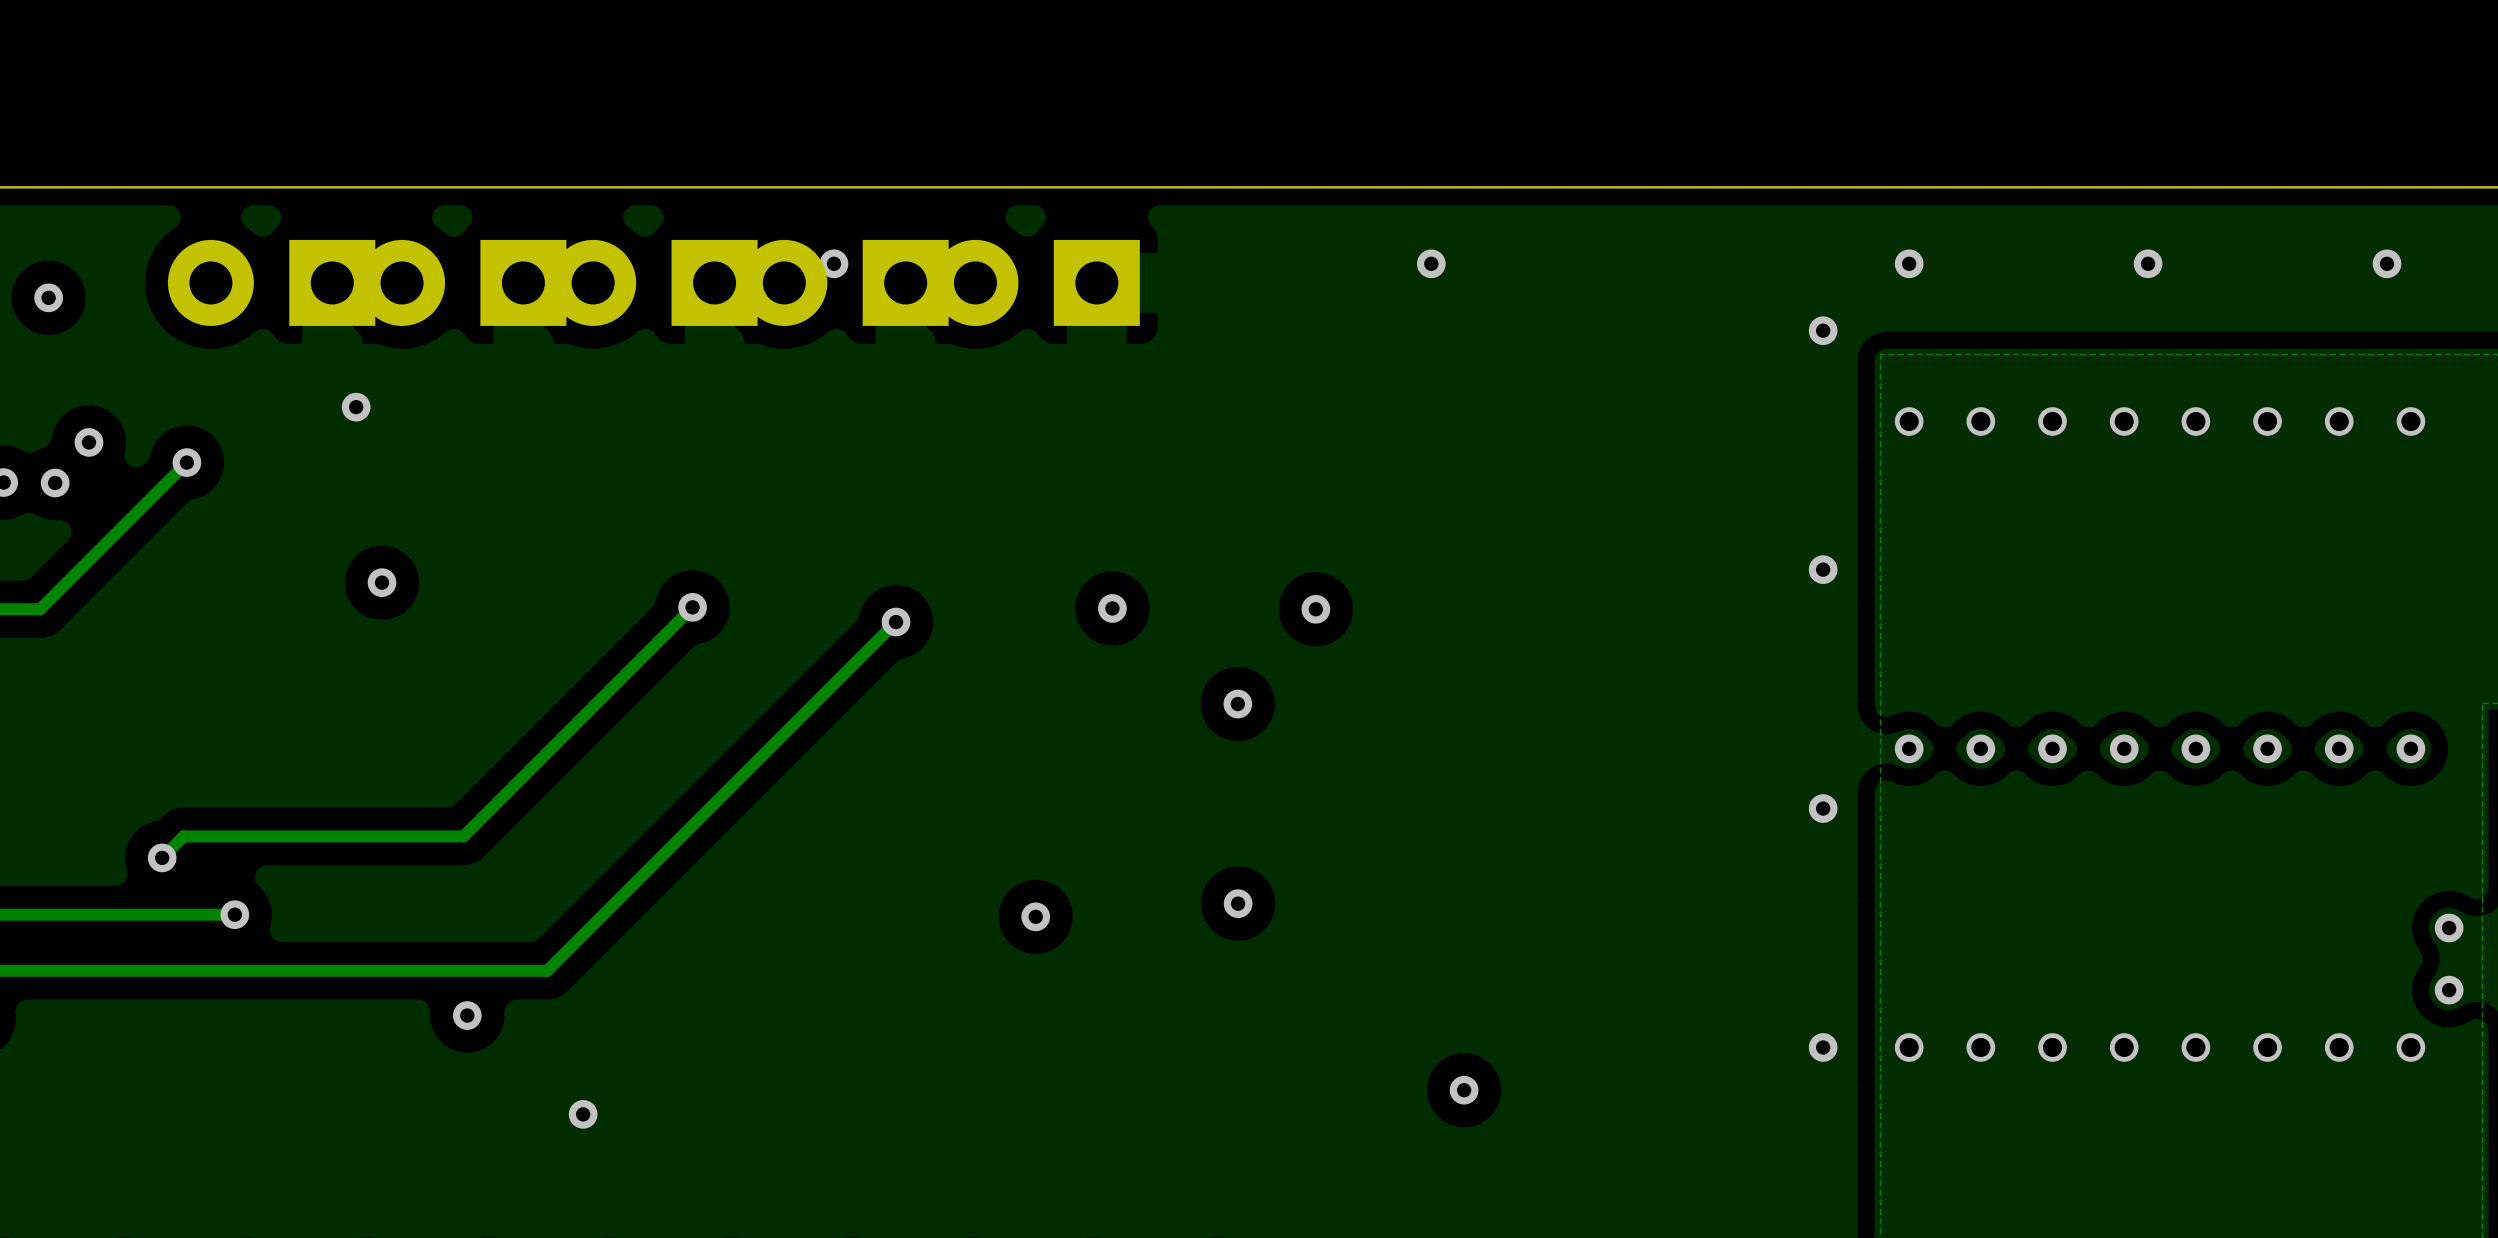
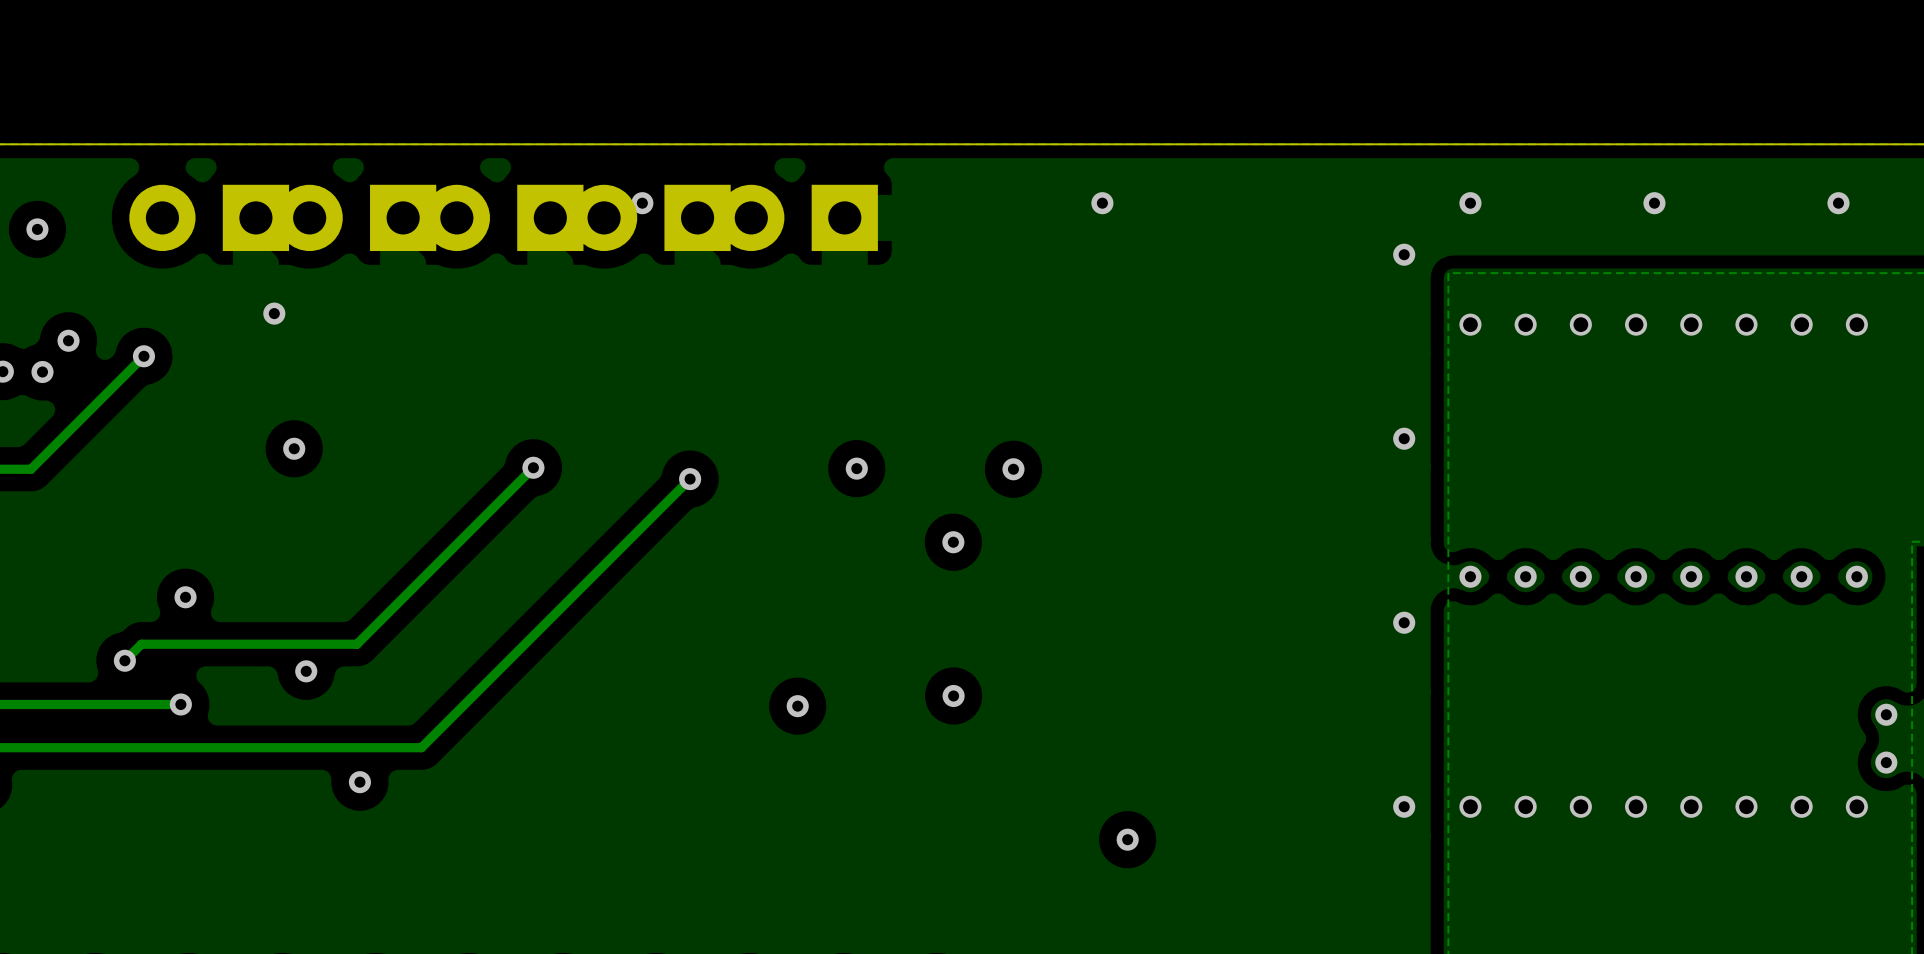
via: none -> (185, 597)
via: none -> (306, 671)
via: (583, 1114) -> none

